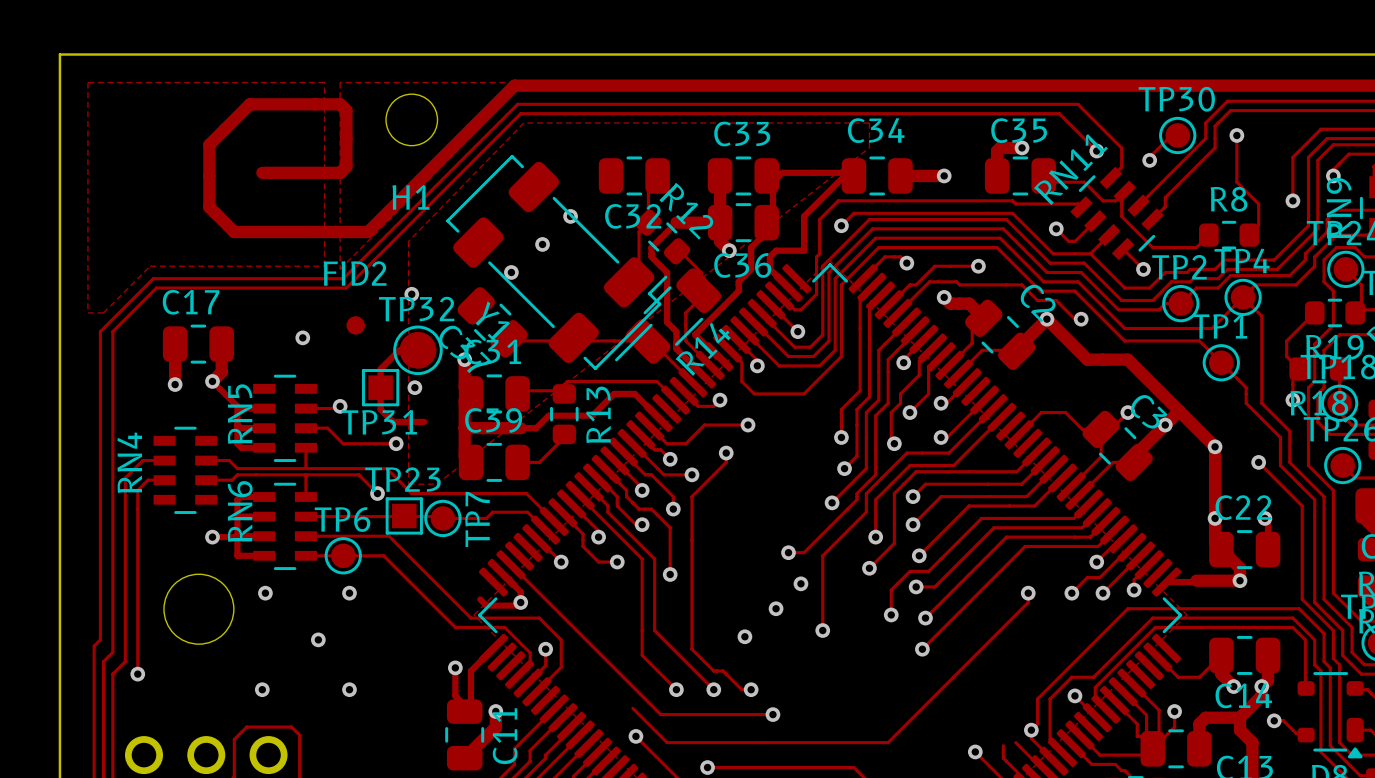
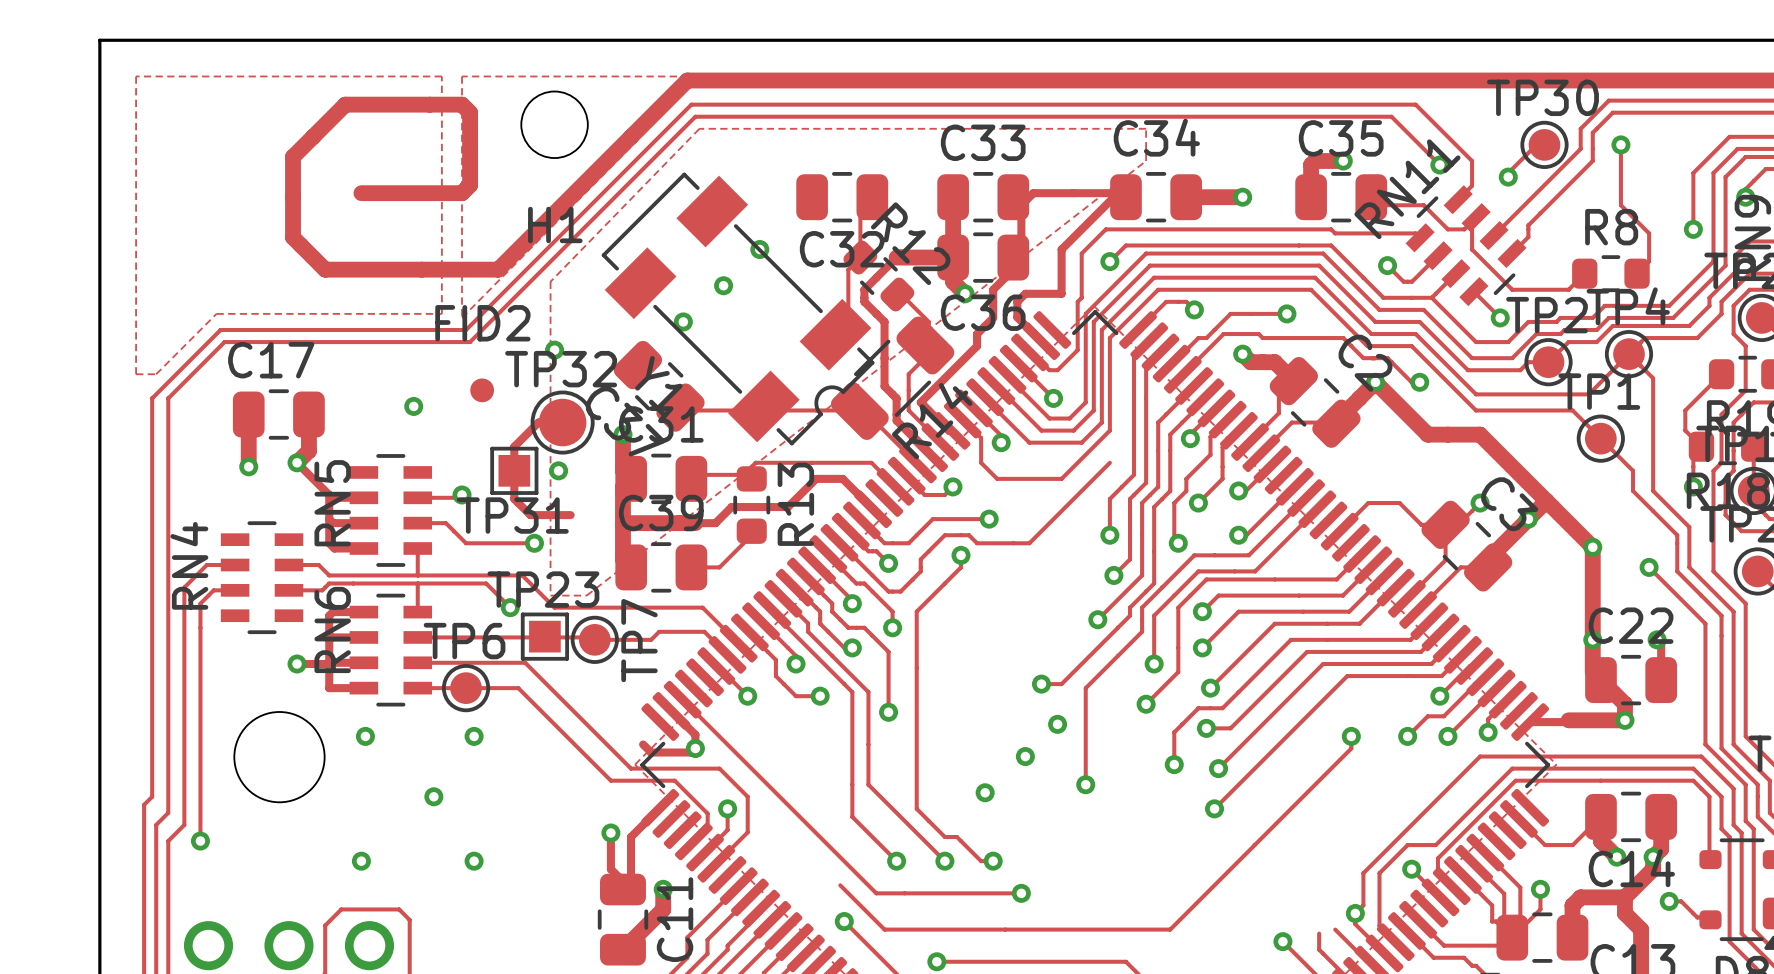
Y1 footprint: [446, 154, 668, 371] -> [601, 172, 875, 446]
track: (663, 474) (691, 474) -> (880, 583) (888, 591) (900, 591) (920, 571) (920, 559) (944, 535) (969, 535) (977, 543) (1029, 543) (1109, 462)
via: (691, 474) -> none

